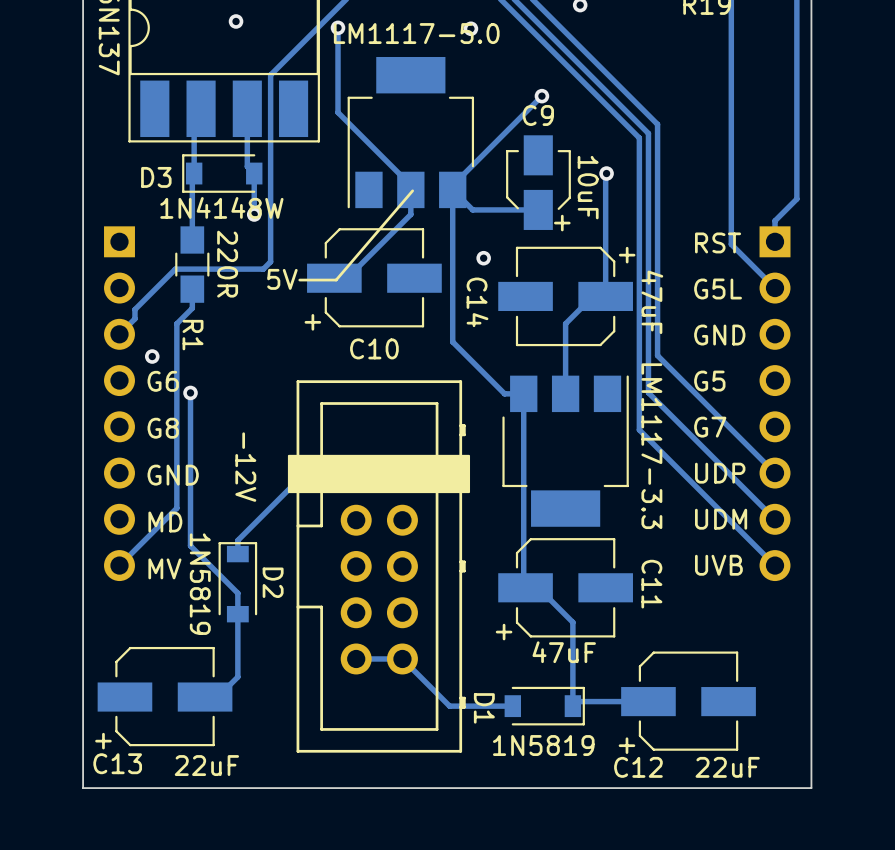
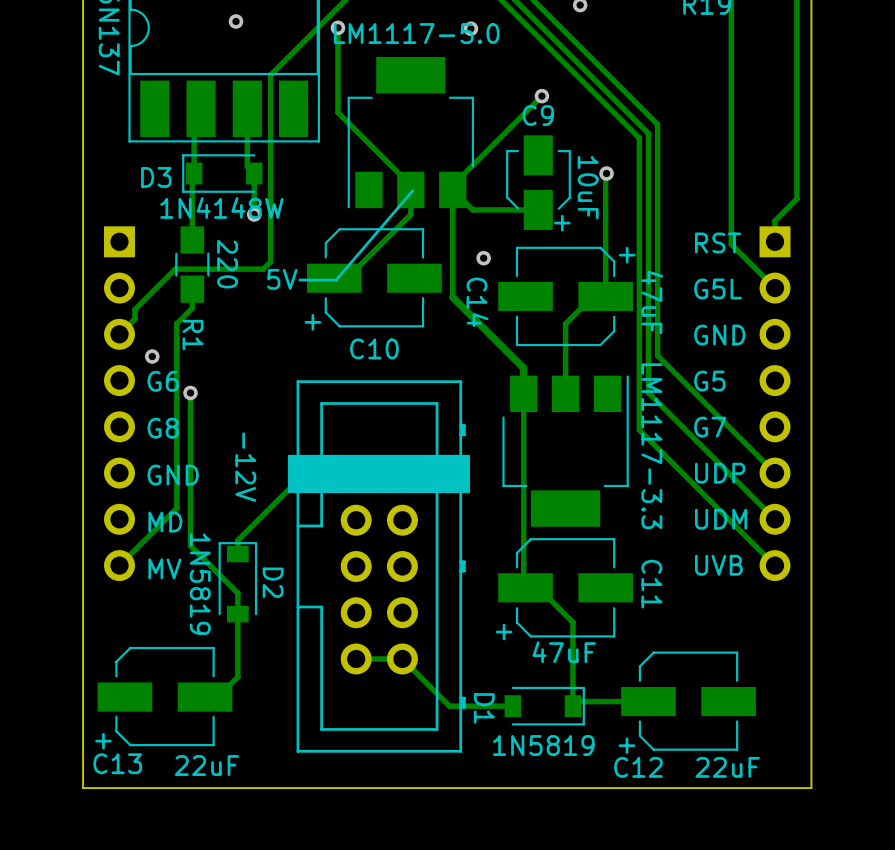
R1 value: 220R (227, 264) -> 220 (227, 264)
track: (452, 297) (452, 341) (504, 393) (523, 393) -> (452, 297) (523, 368) (523, 393)

